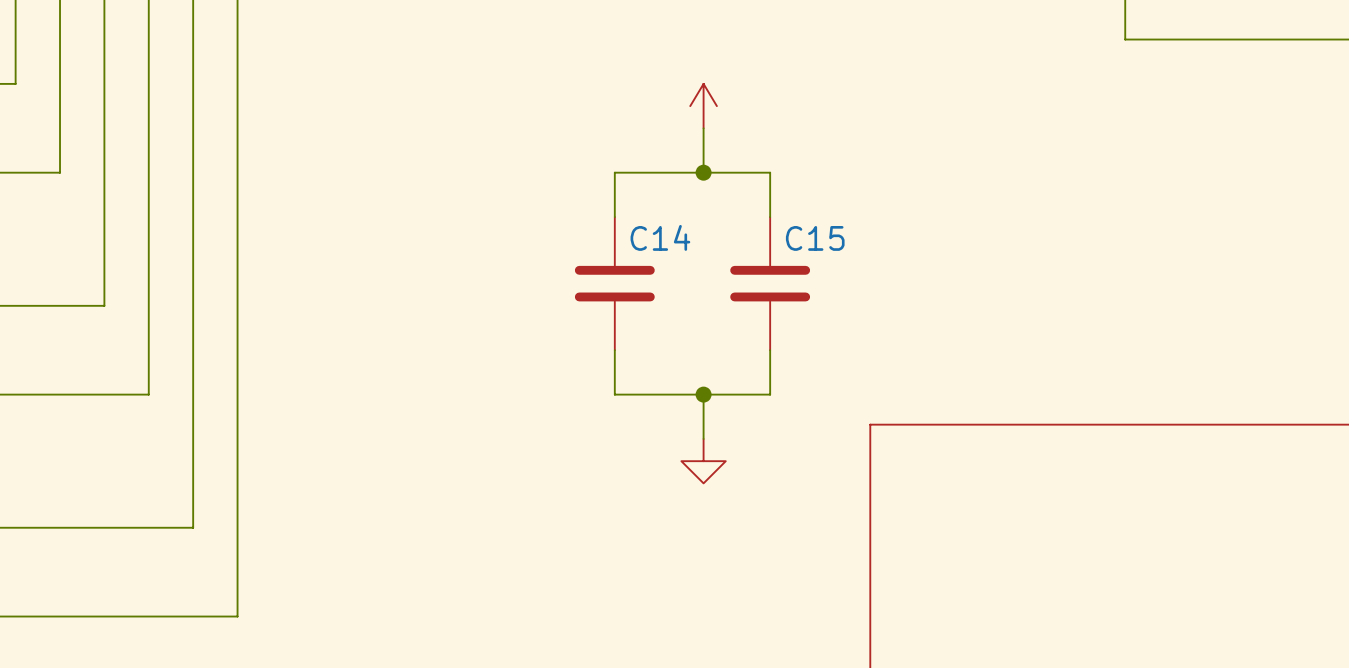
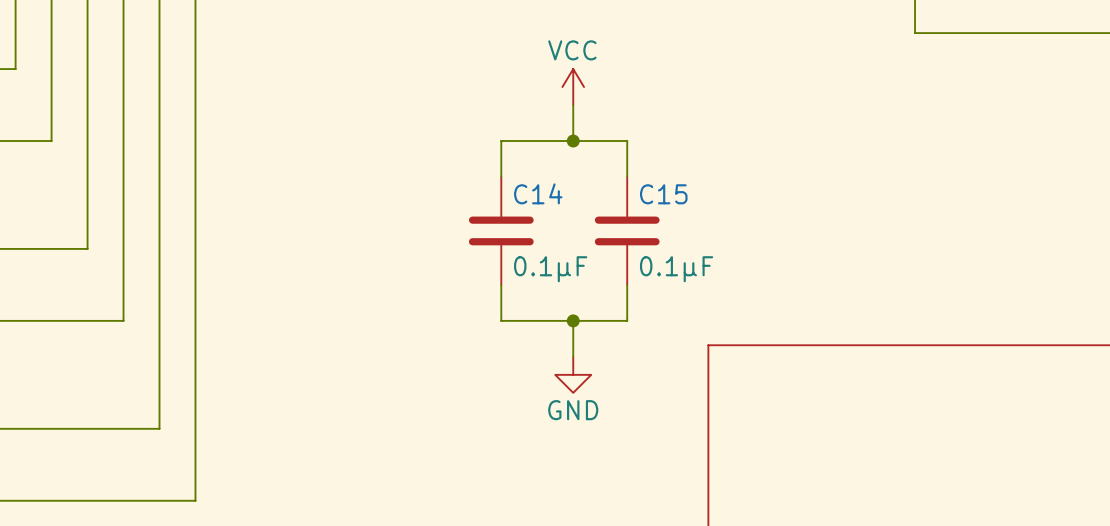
power symbol text: none -> VCC (572, 50)
C14 value: none -> 0.1µF (550, 269)
C15 value: none -> 0.1µF (676, 269)
power symbol text: none -> GND (573, 410)

